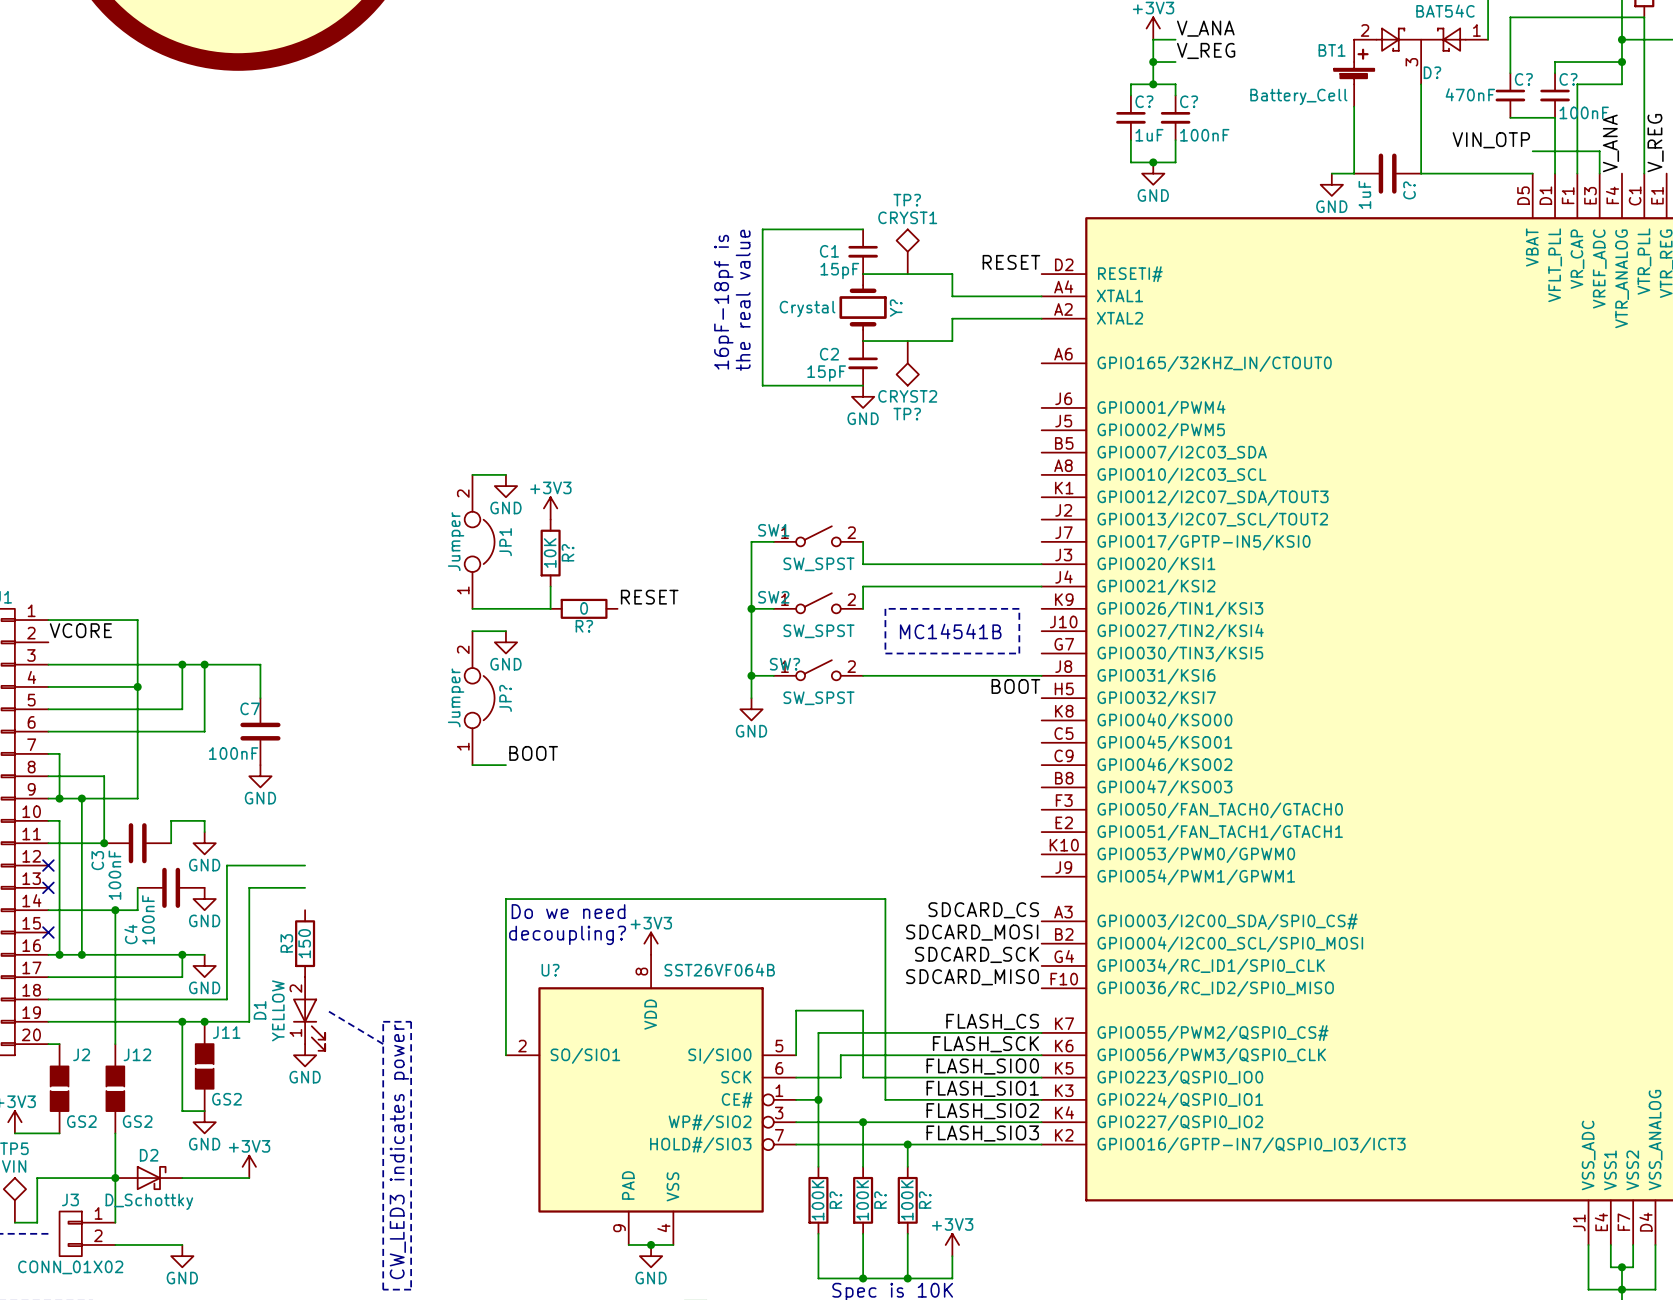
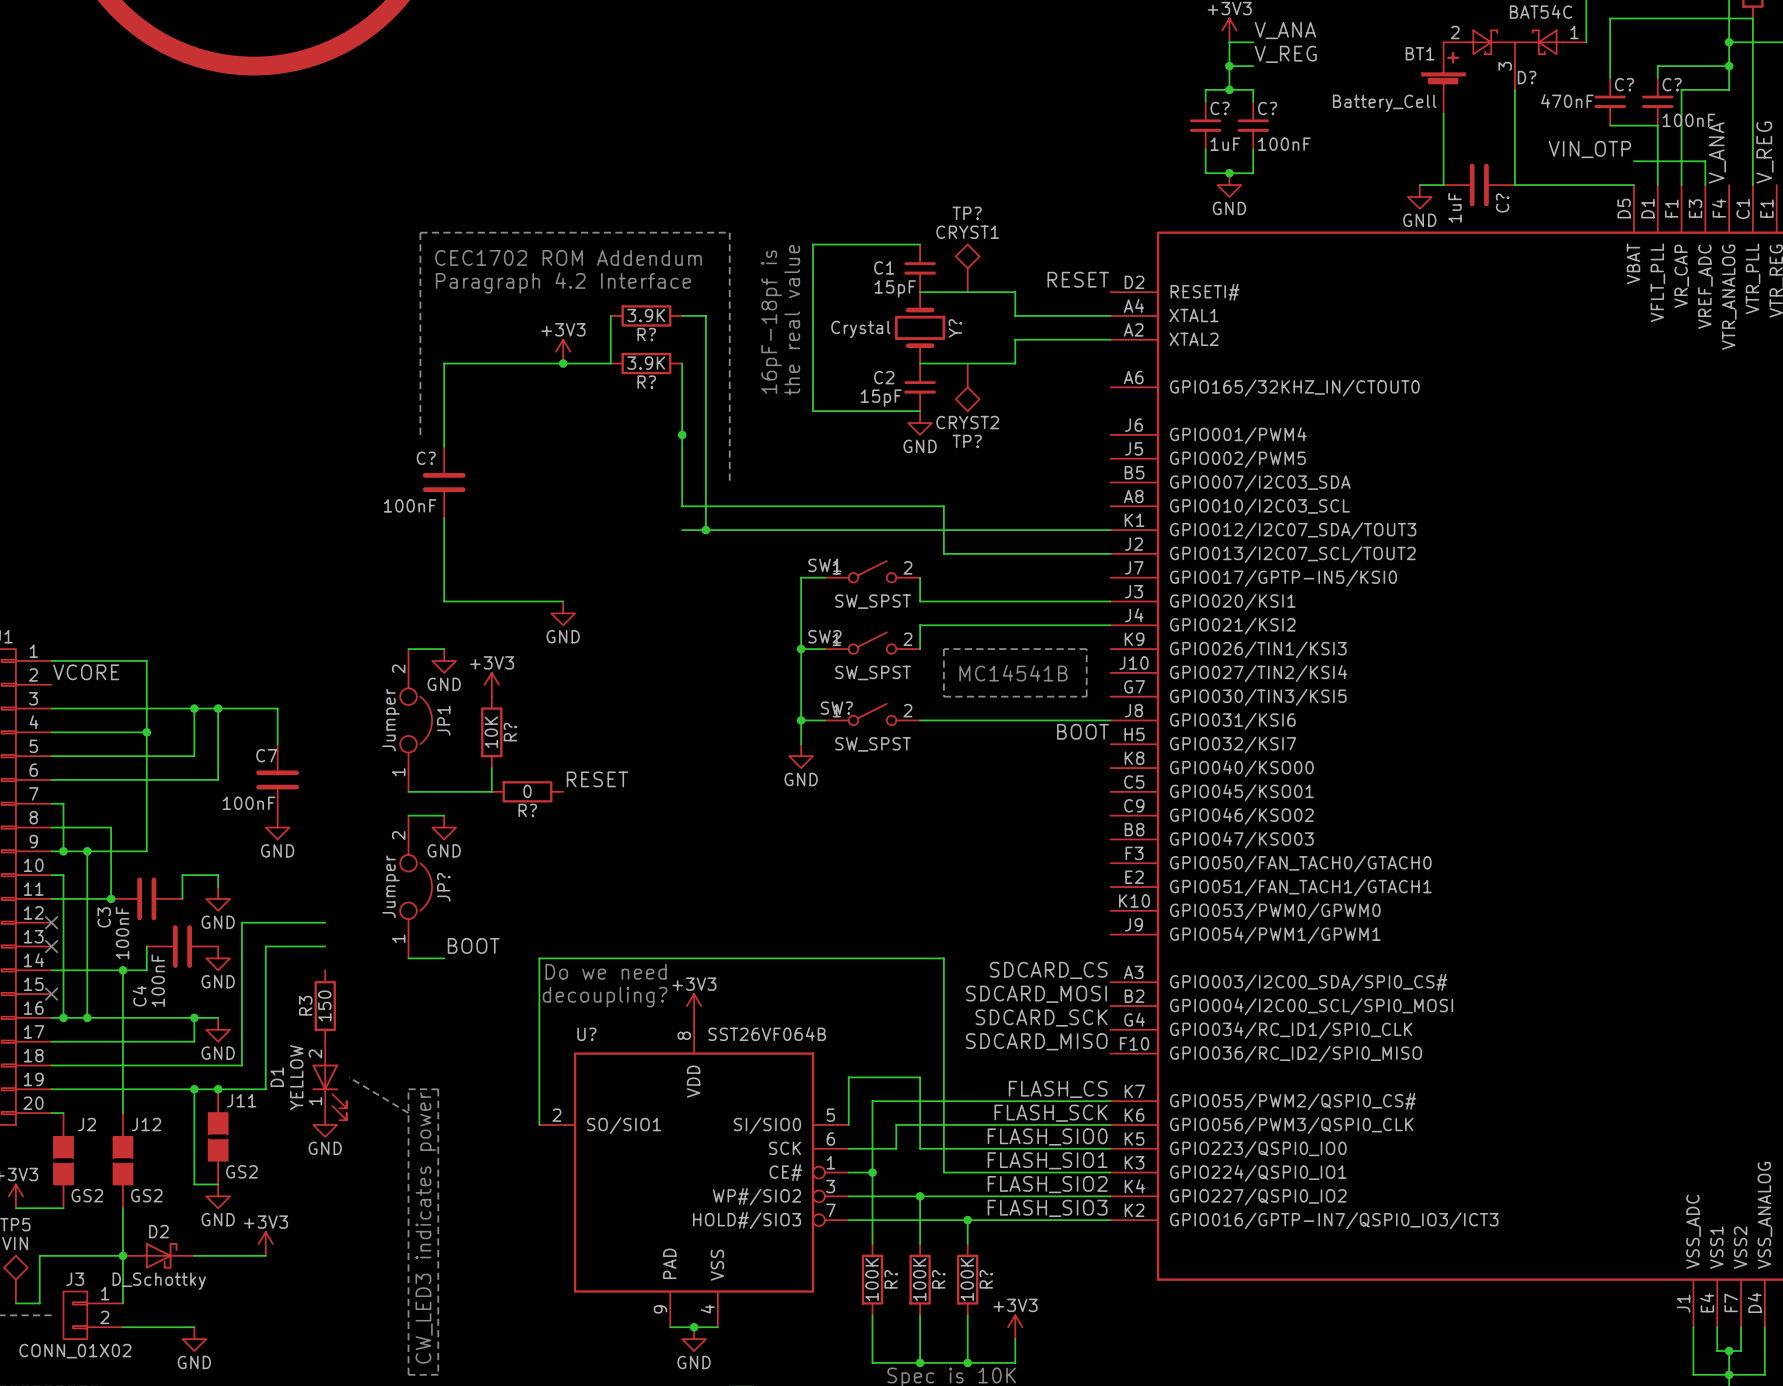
text: none -> CEC1702 ROM Addendum (568, 257)
text: none -> Paragraph 4.2 Interface (563, 282)
wire: none -> (610, 315) (610, 363) (444, 363) (444, 446)
R?: none -> 3.9K (646, 315)
wire: none -> (682, 315) (705, 315) (705, 530)
power symbol: none -> +3V3 (563, 351)
junction: none -> (563, 363)
R?: none -> 3.9K (646, 363)
wire: none -> (682, 363) (682, 506) (943, 506) (943, 553) (1110, 553)
line: none -> (420, 434) (420, 232) (729, 232) (729, 482)
junction: none -> (682, 434)
C?: none -> 100nF (444, 482)
wire: (472, 474) (505, 474) -> (408, 649) (444, 649)
wire: none -> (444, 518) (444, 601) (563, 601)
power symbol: GND (505, 486) -> none
wire: none -> (682, 530) (1110, 530)
junction: none -> (705, 530)
power symbol: +3V3 (550, 508) -> none
JP1 position: (479, 541) -> (416, 720)
R? position: (550, 553) -> (491, 732)
power symbol: none -> GND (563, 613)
wire: (550, 586) (550, 608) (472, 608) -> (491, 768) (491, 791) (408, 791)
label position: RESET (649, 597) -> RESET (597, 779)
R? position: (584, 608) -> (527, 791)
power symbol: none -> GND (444, 660)
wire: (472, 631) (505, 631) -> (408, 815) (444, 815)
power symbol: none -> +3V3 (491, 684)
power symbol: GND (505, 642) -> none
JP? position: (479, 698) -> (416, 887)
label position: BOOT (533, 753) -> BOOT (473, 945)
wire: (472, 765) (505, 765) -> (408, 958) (444, 958)
power symbol: none -> GND (444, 827)

